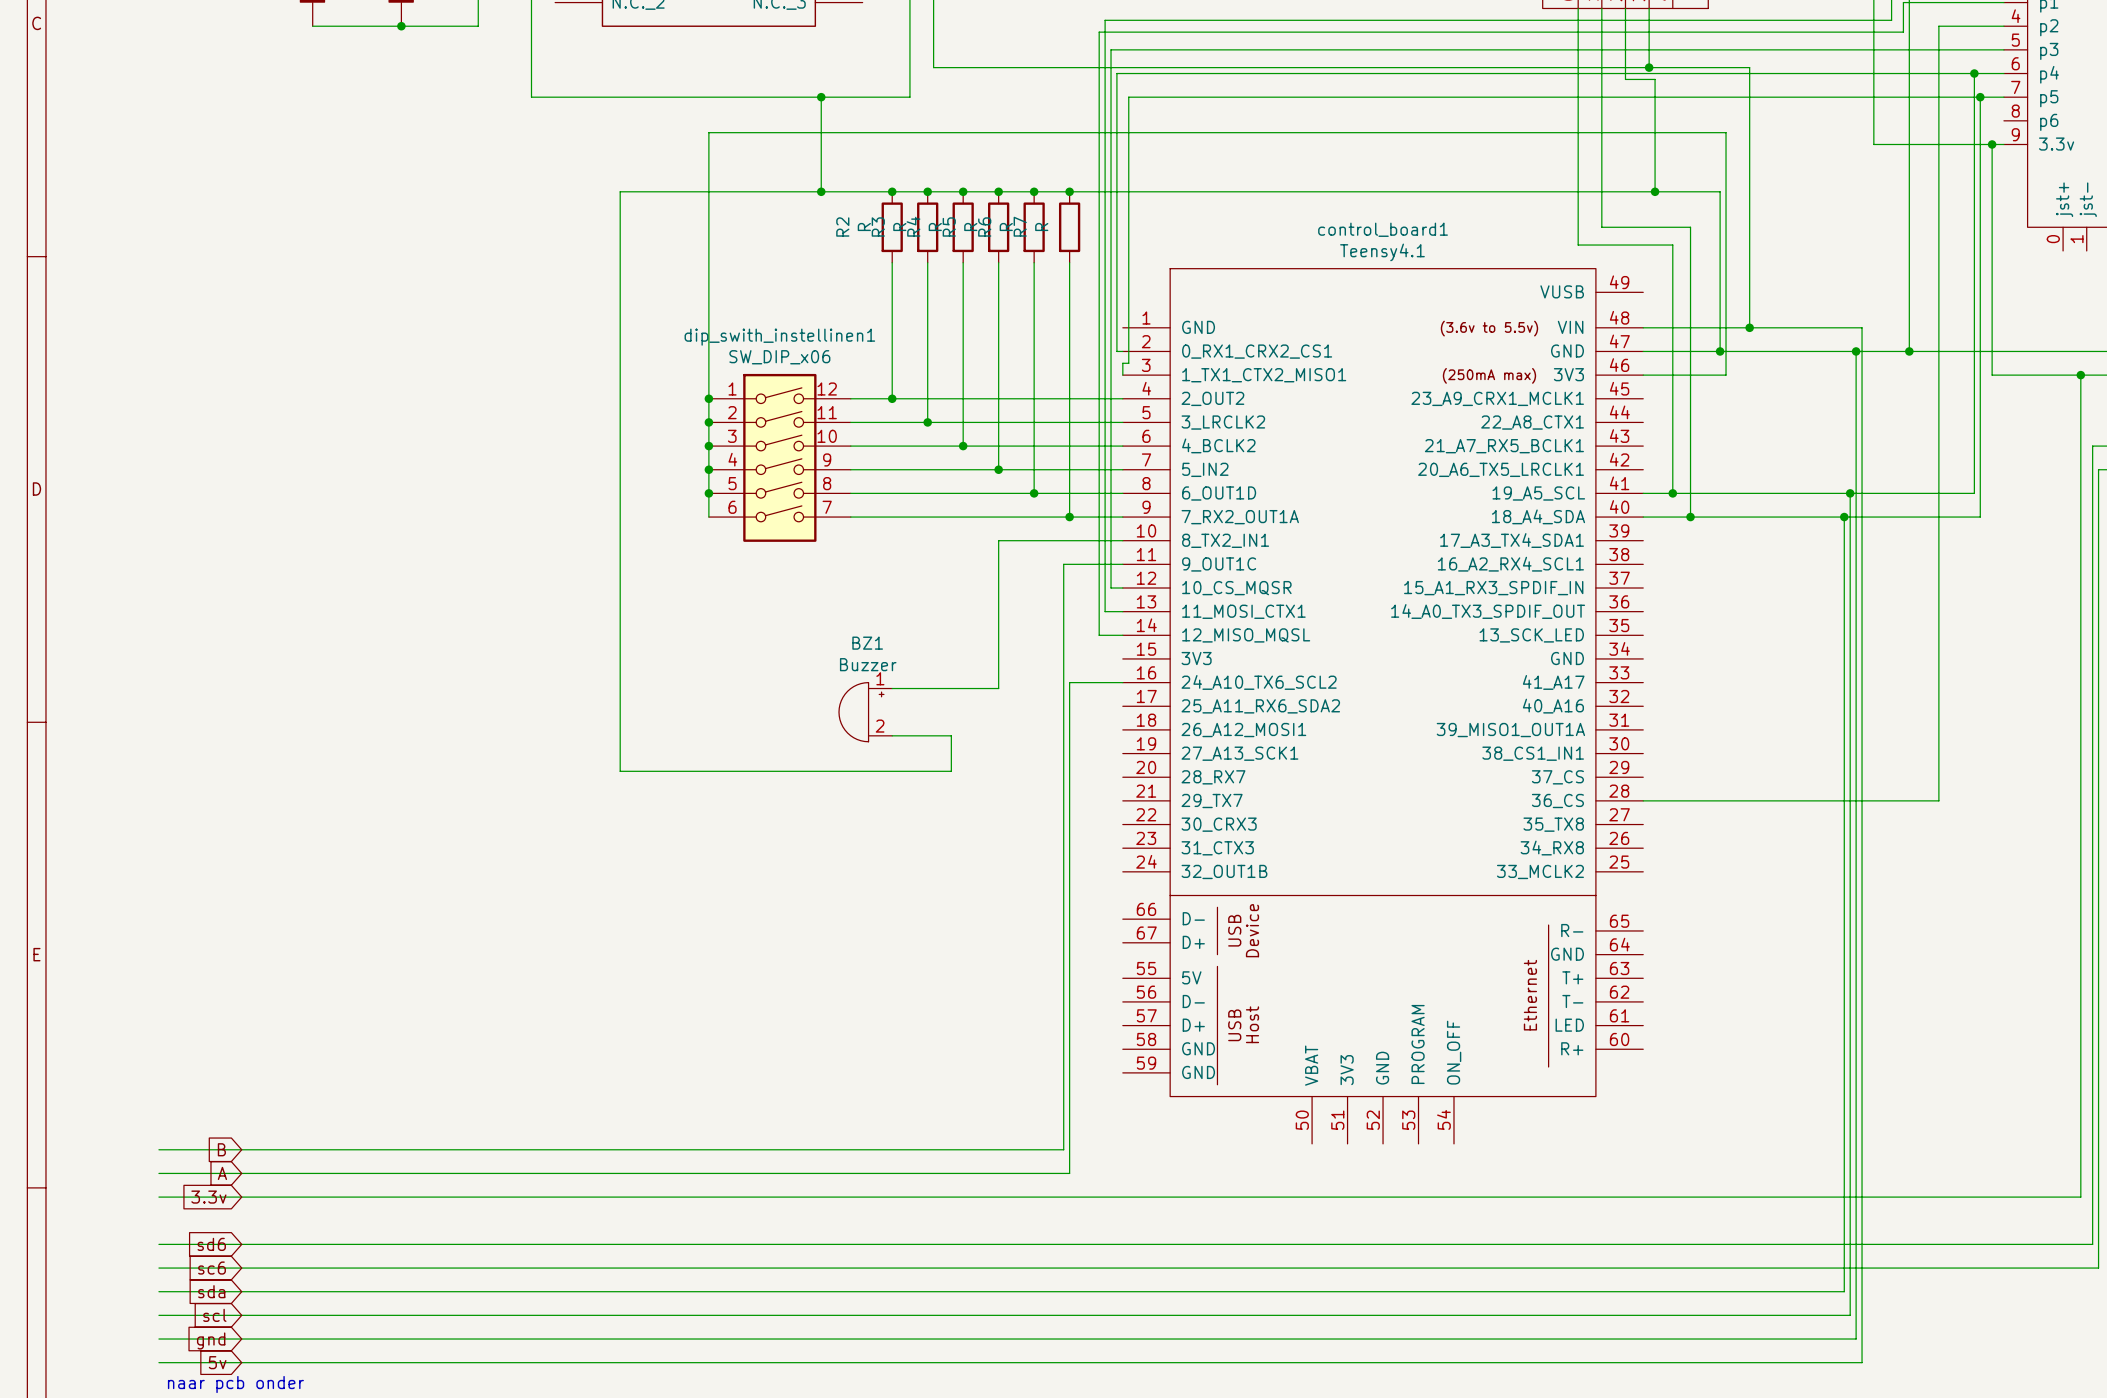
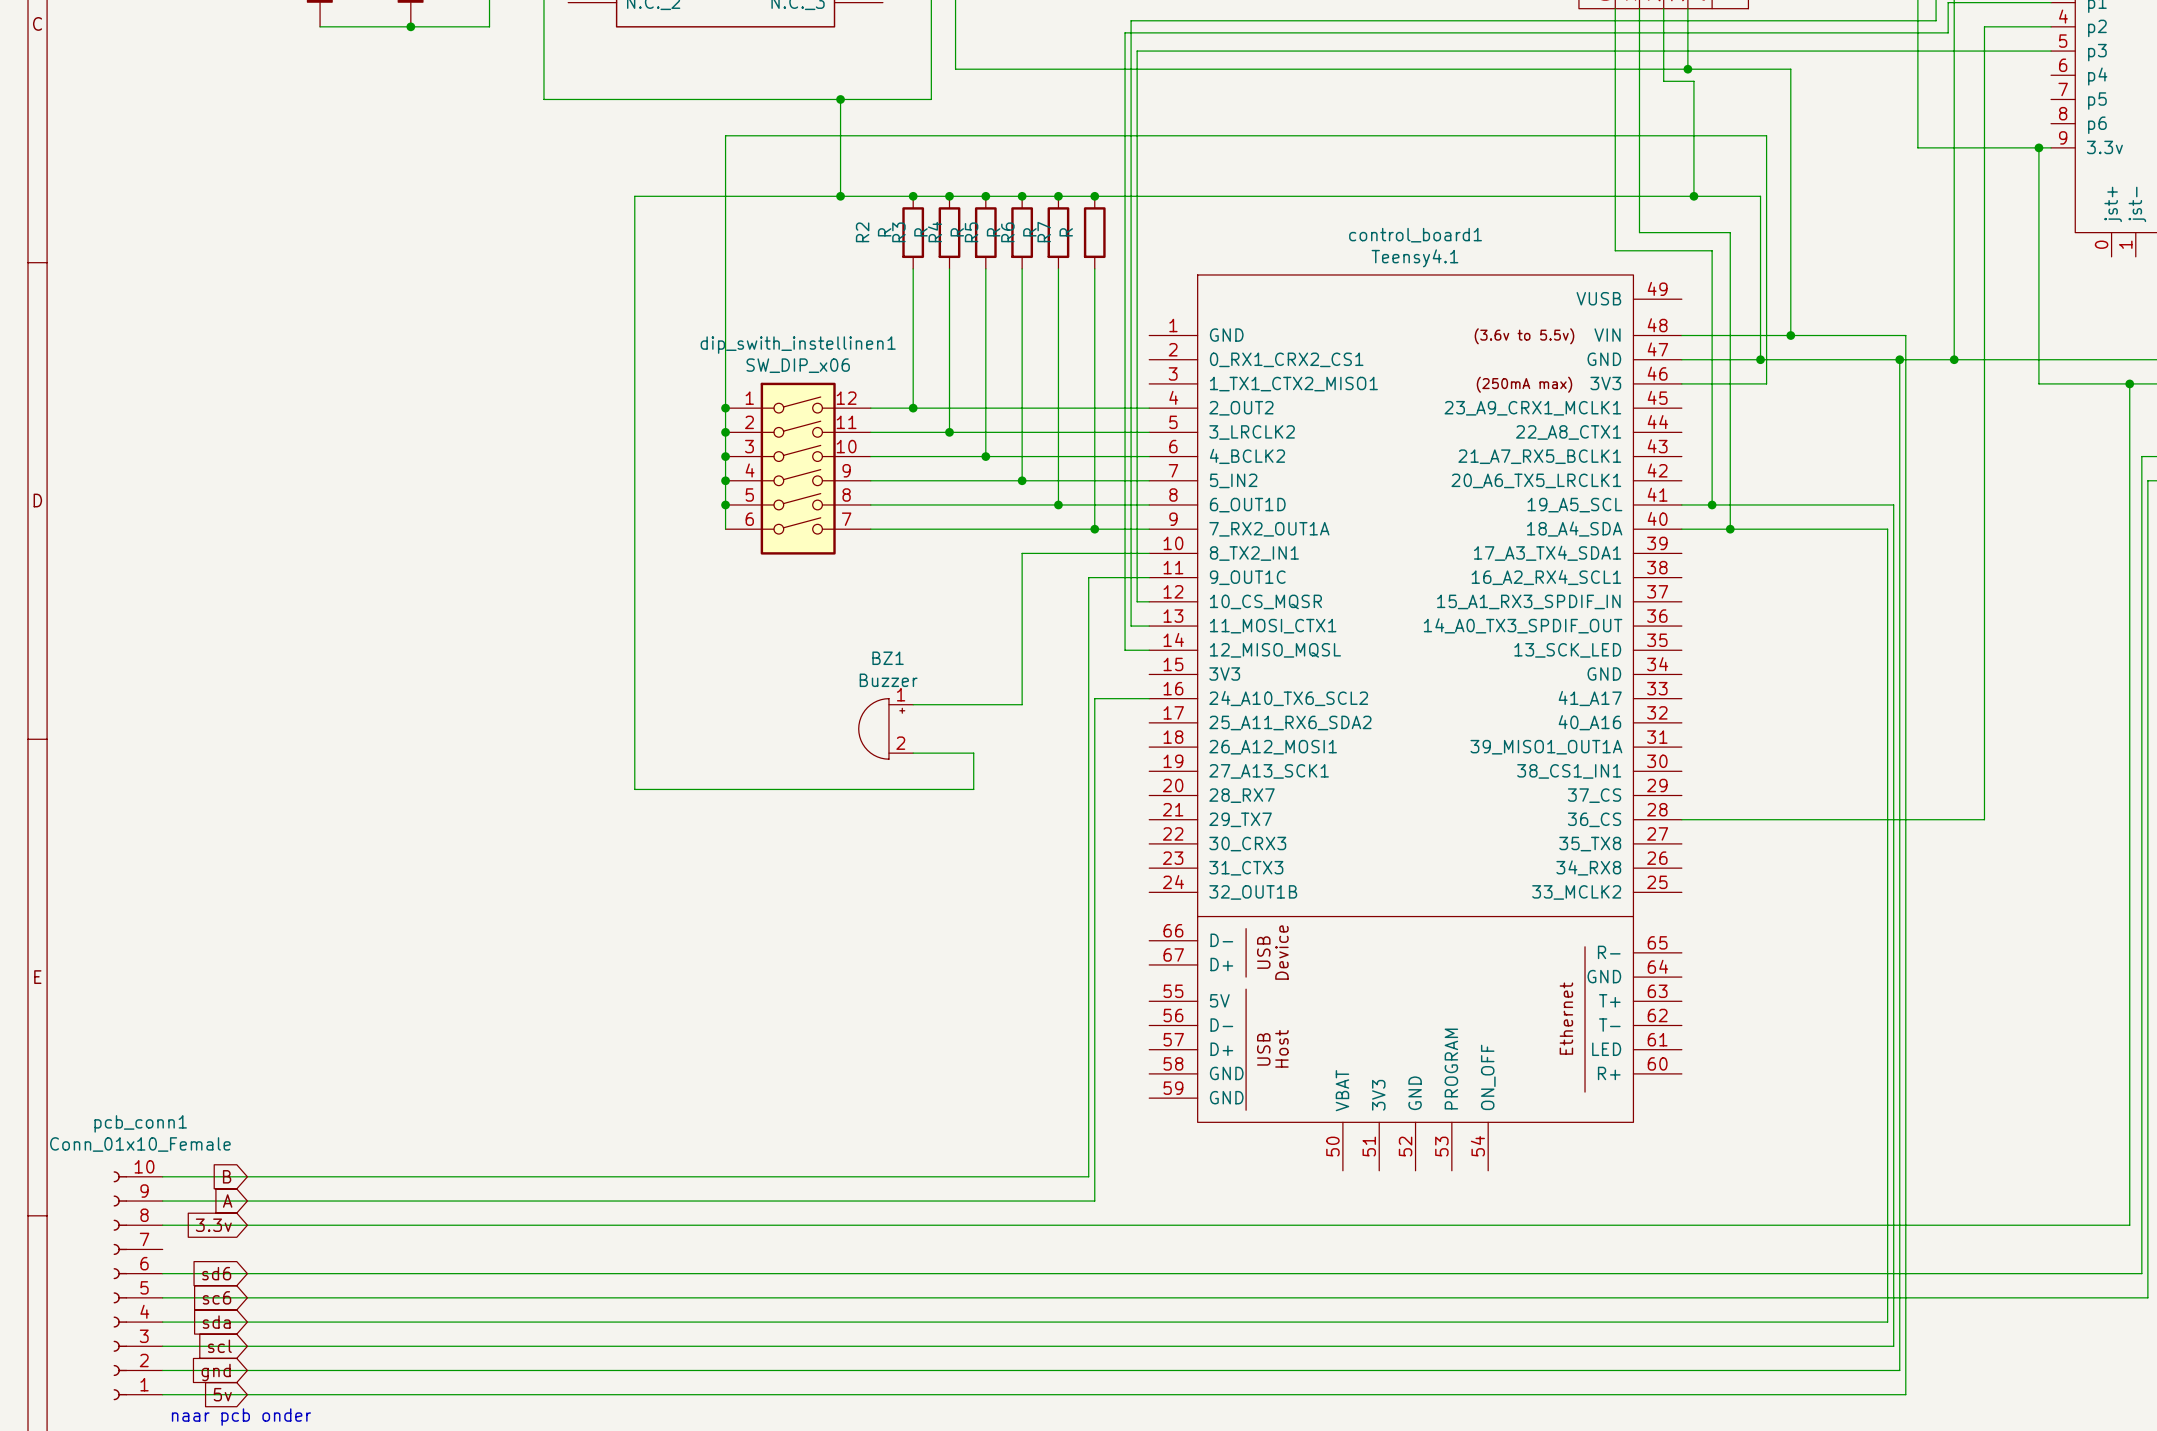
wire: (1974, 73) (1974, 493) (1850, 493) -> none
junction: (1974, 73) -> none
wire: (2003, 73) (1116, 73) (1116, 351) (1122, 351) -> none
wire: (1980, 97) (1980, 517) (1844, 517) -> none
junction: (1980, 97) -> none
wire: (2003, 97) (1128, 97) (1128, 363) (1122, 363) (1122, 375) -> none
junction: (1850, 493) -> none
junction: (1844, 517) -> none
pcb_conn1: none -> Conn_01x10_Female (138, 1285)

